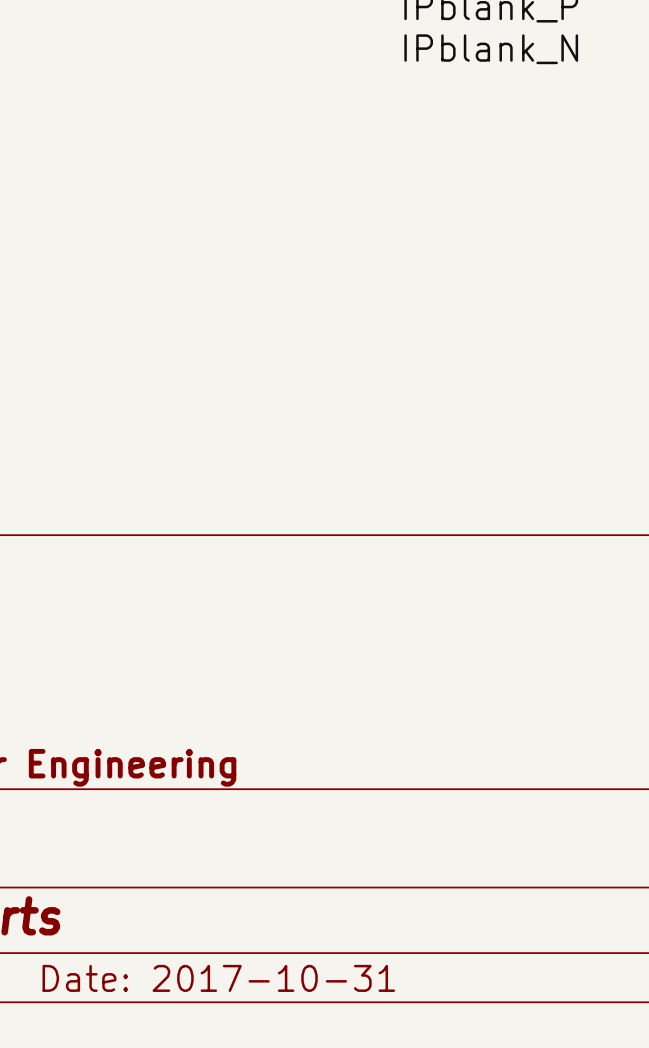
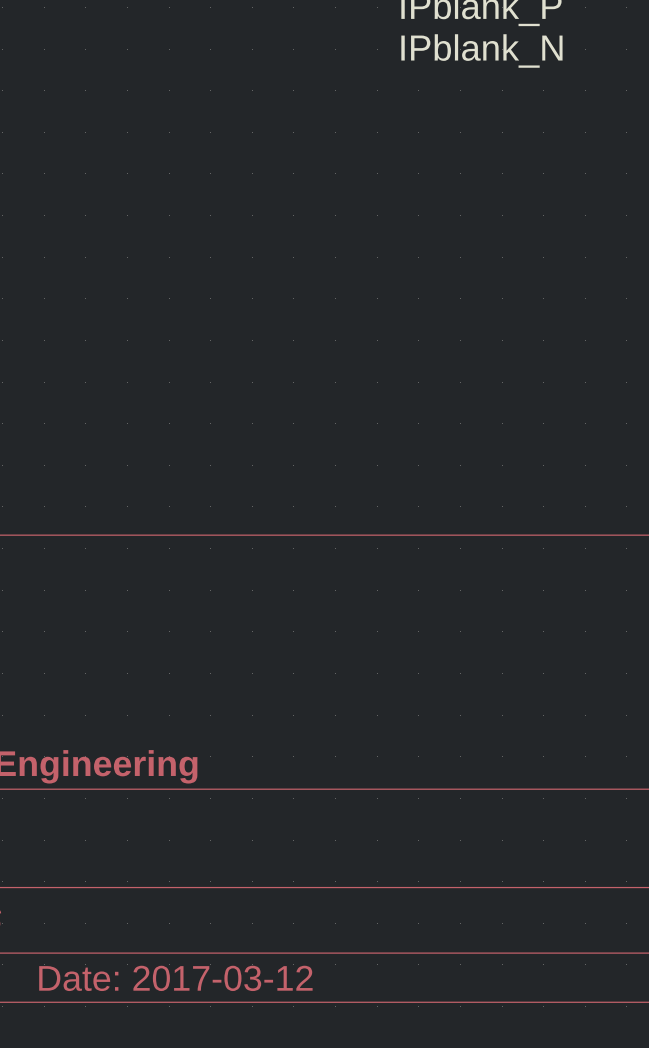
title block: Date: 2017-10-31 (218, 978) -> Date: 2017-03-12 (175, 978)

